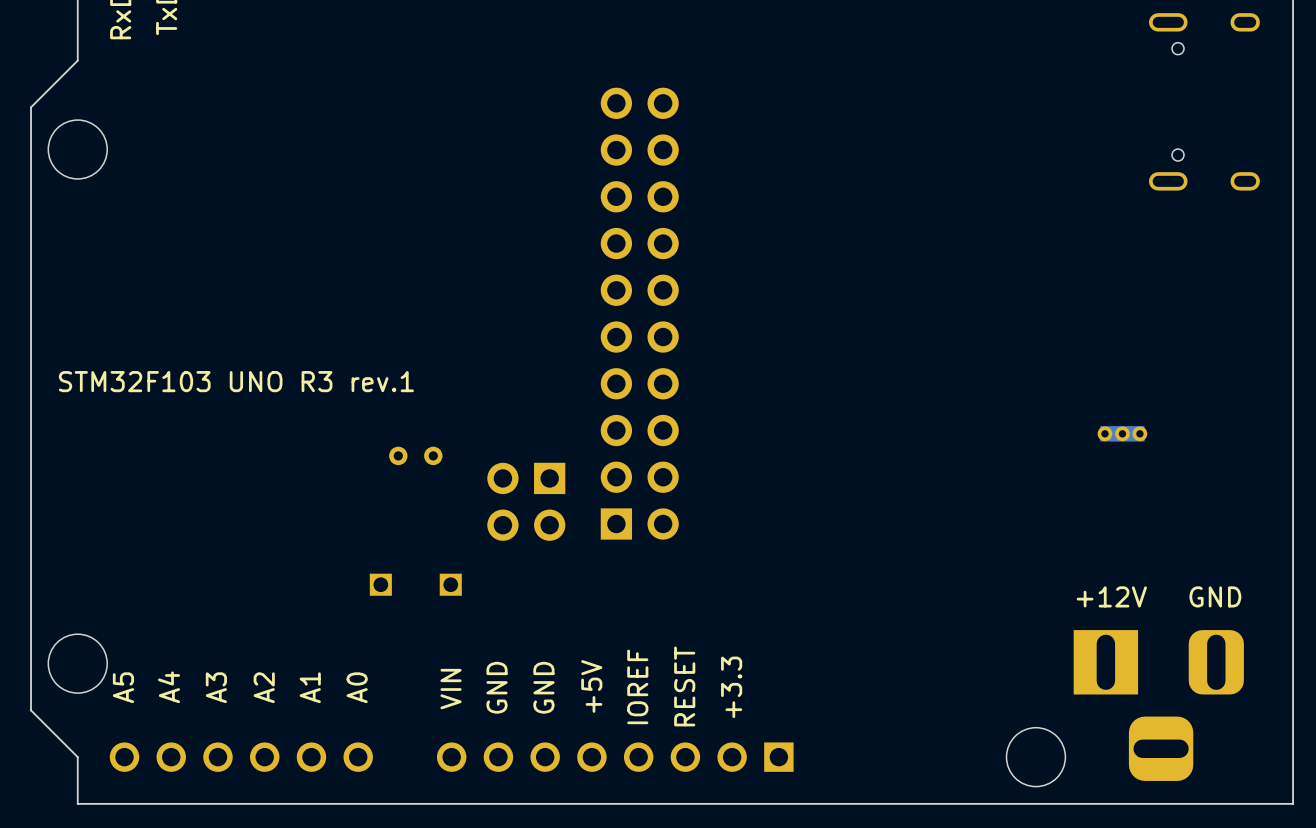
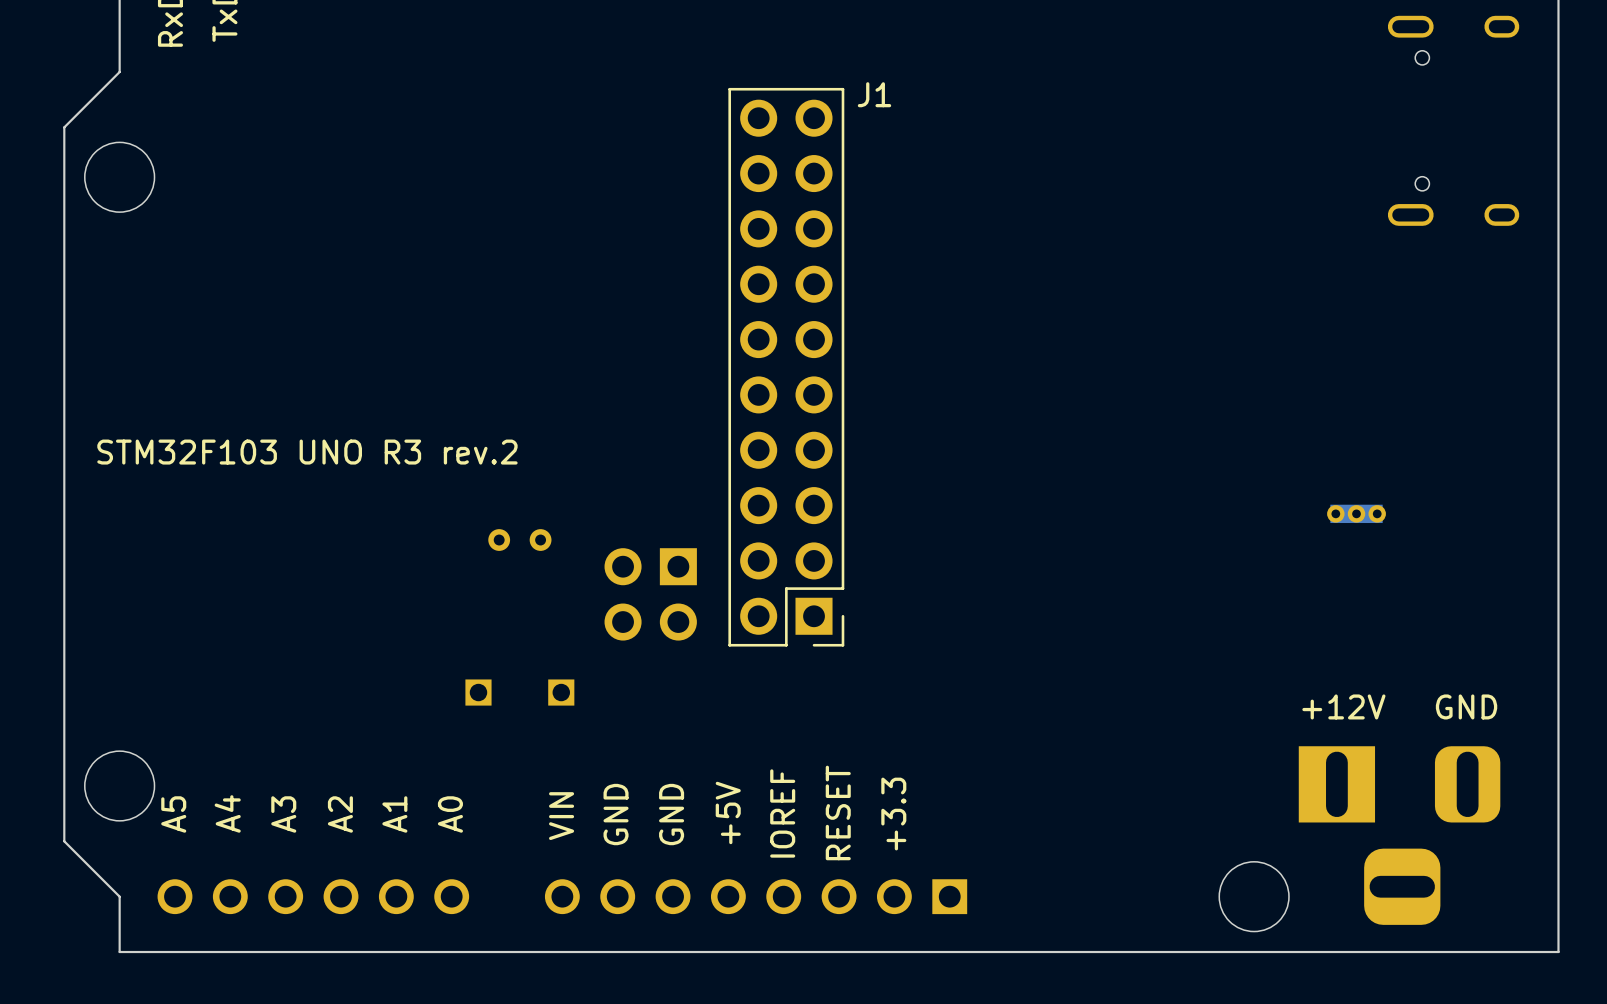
J1 side: top (639, 313) -> bottom (786, 367)
text: STM32F103 UNO R3 rev.1 (236, 381) -> STM32F103 UNO R3 rev.2 (307, 452)

